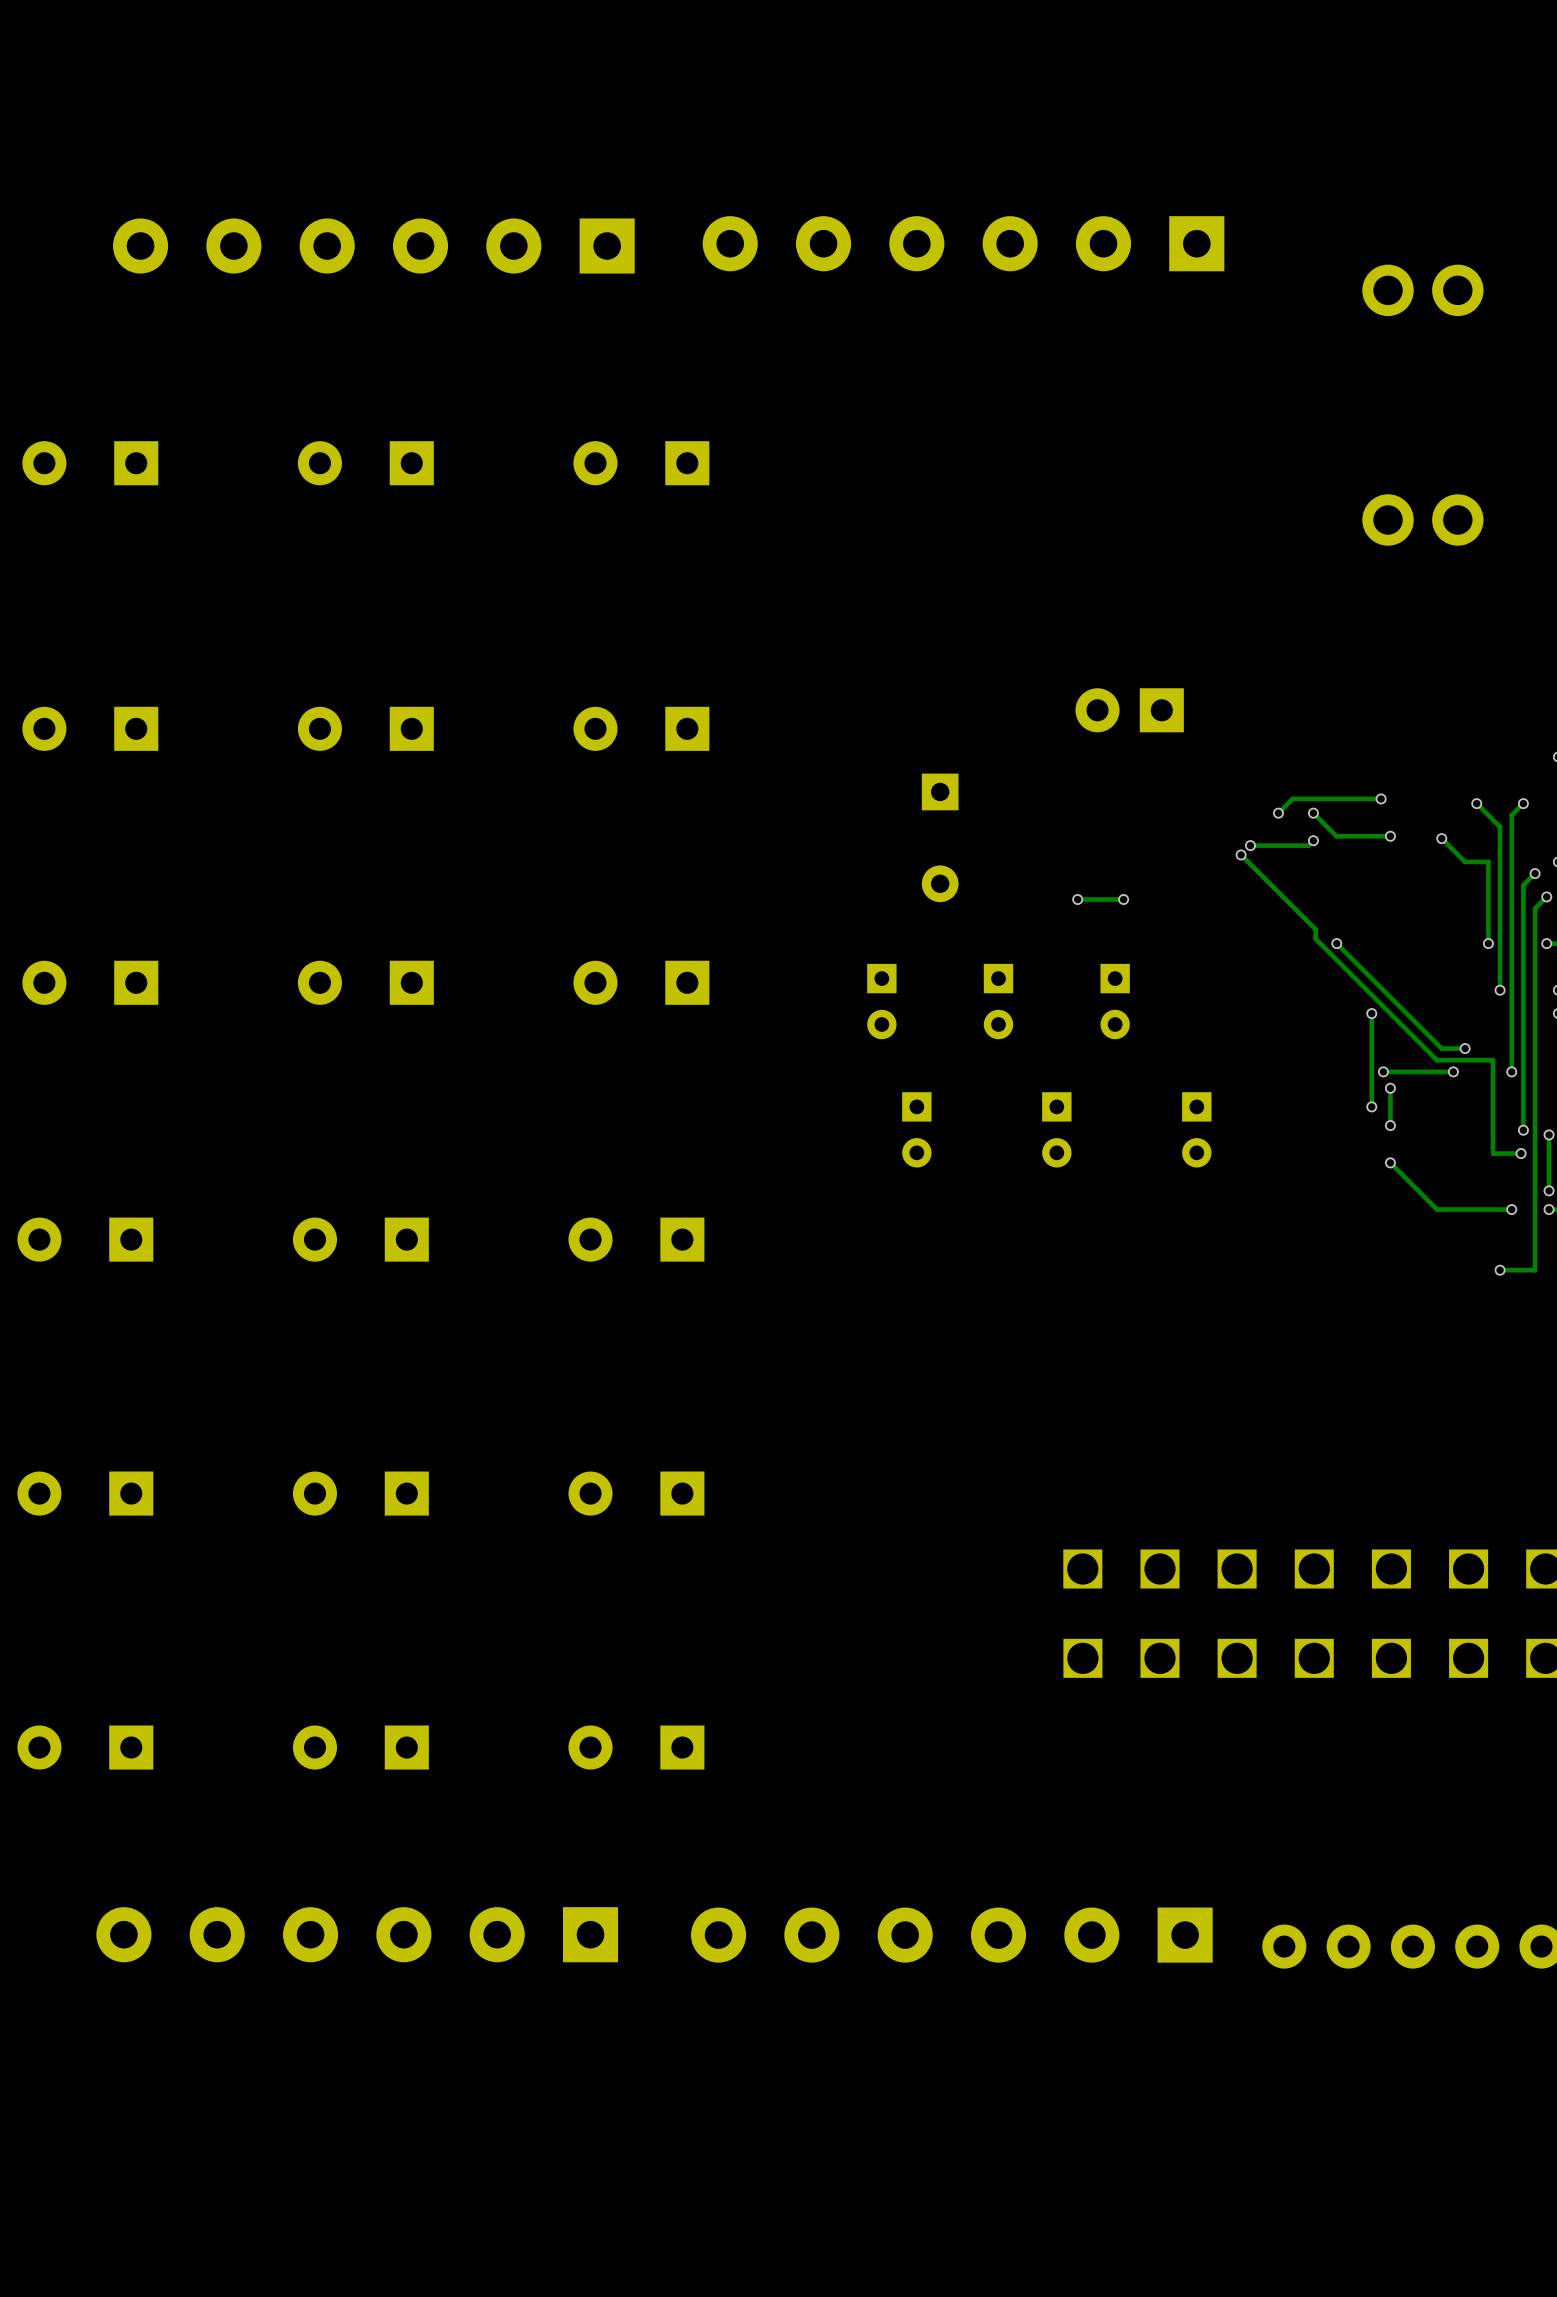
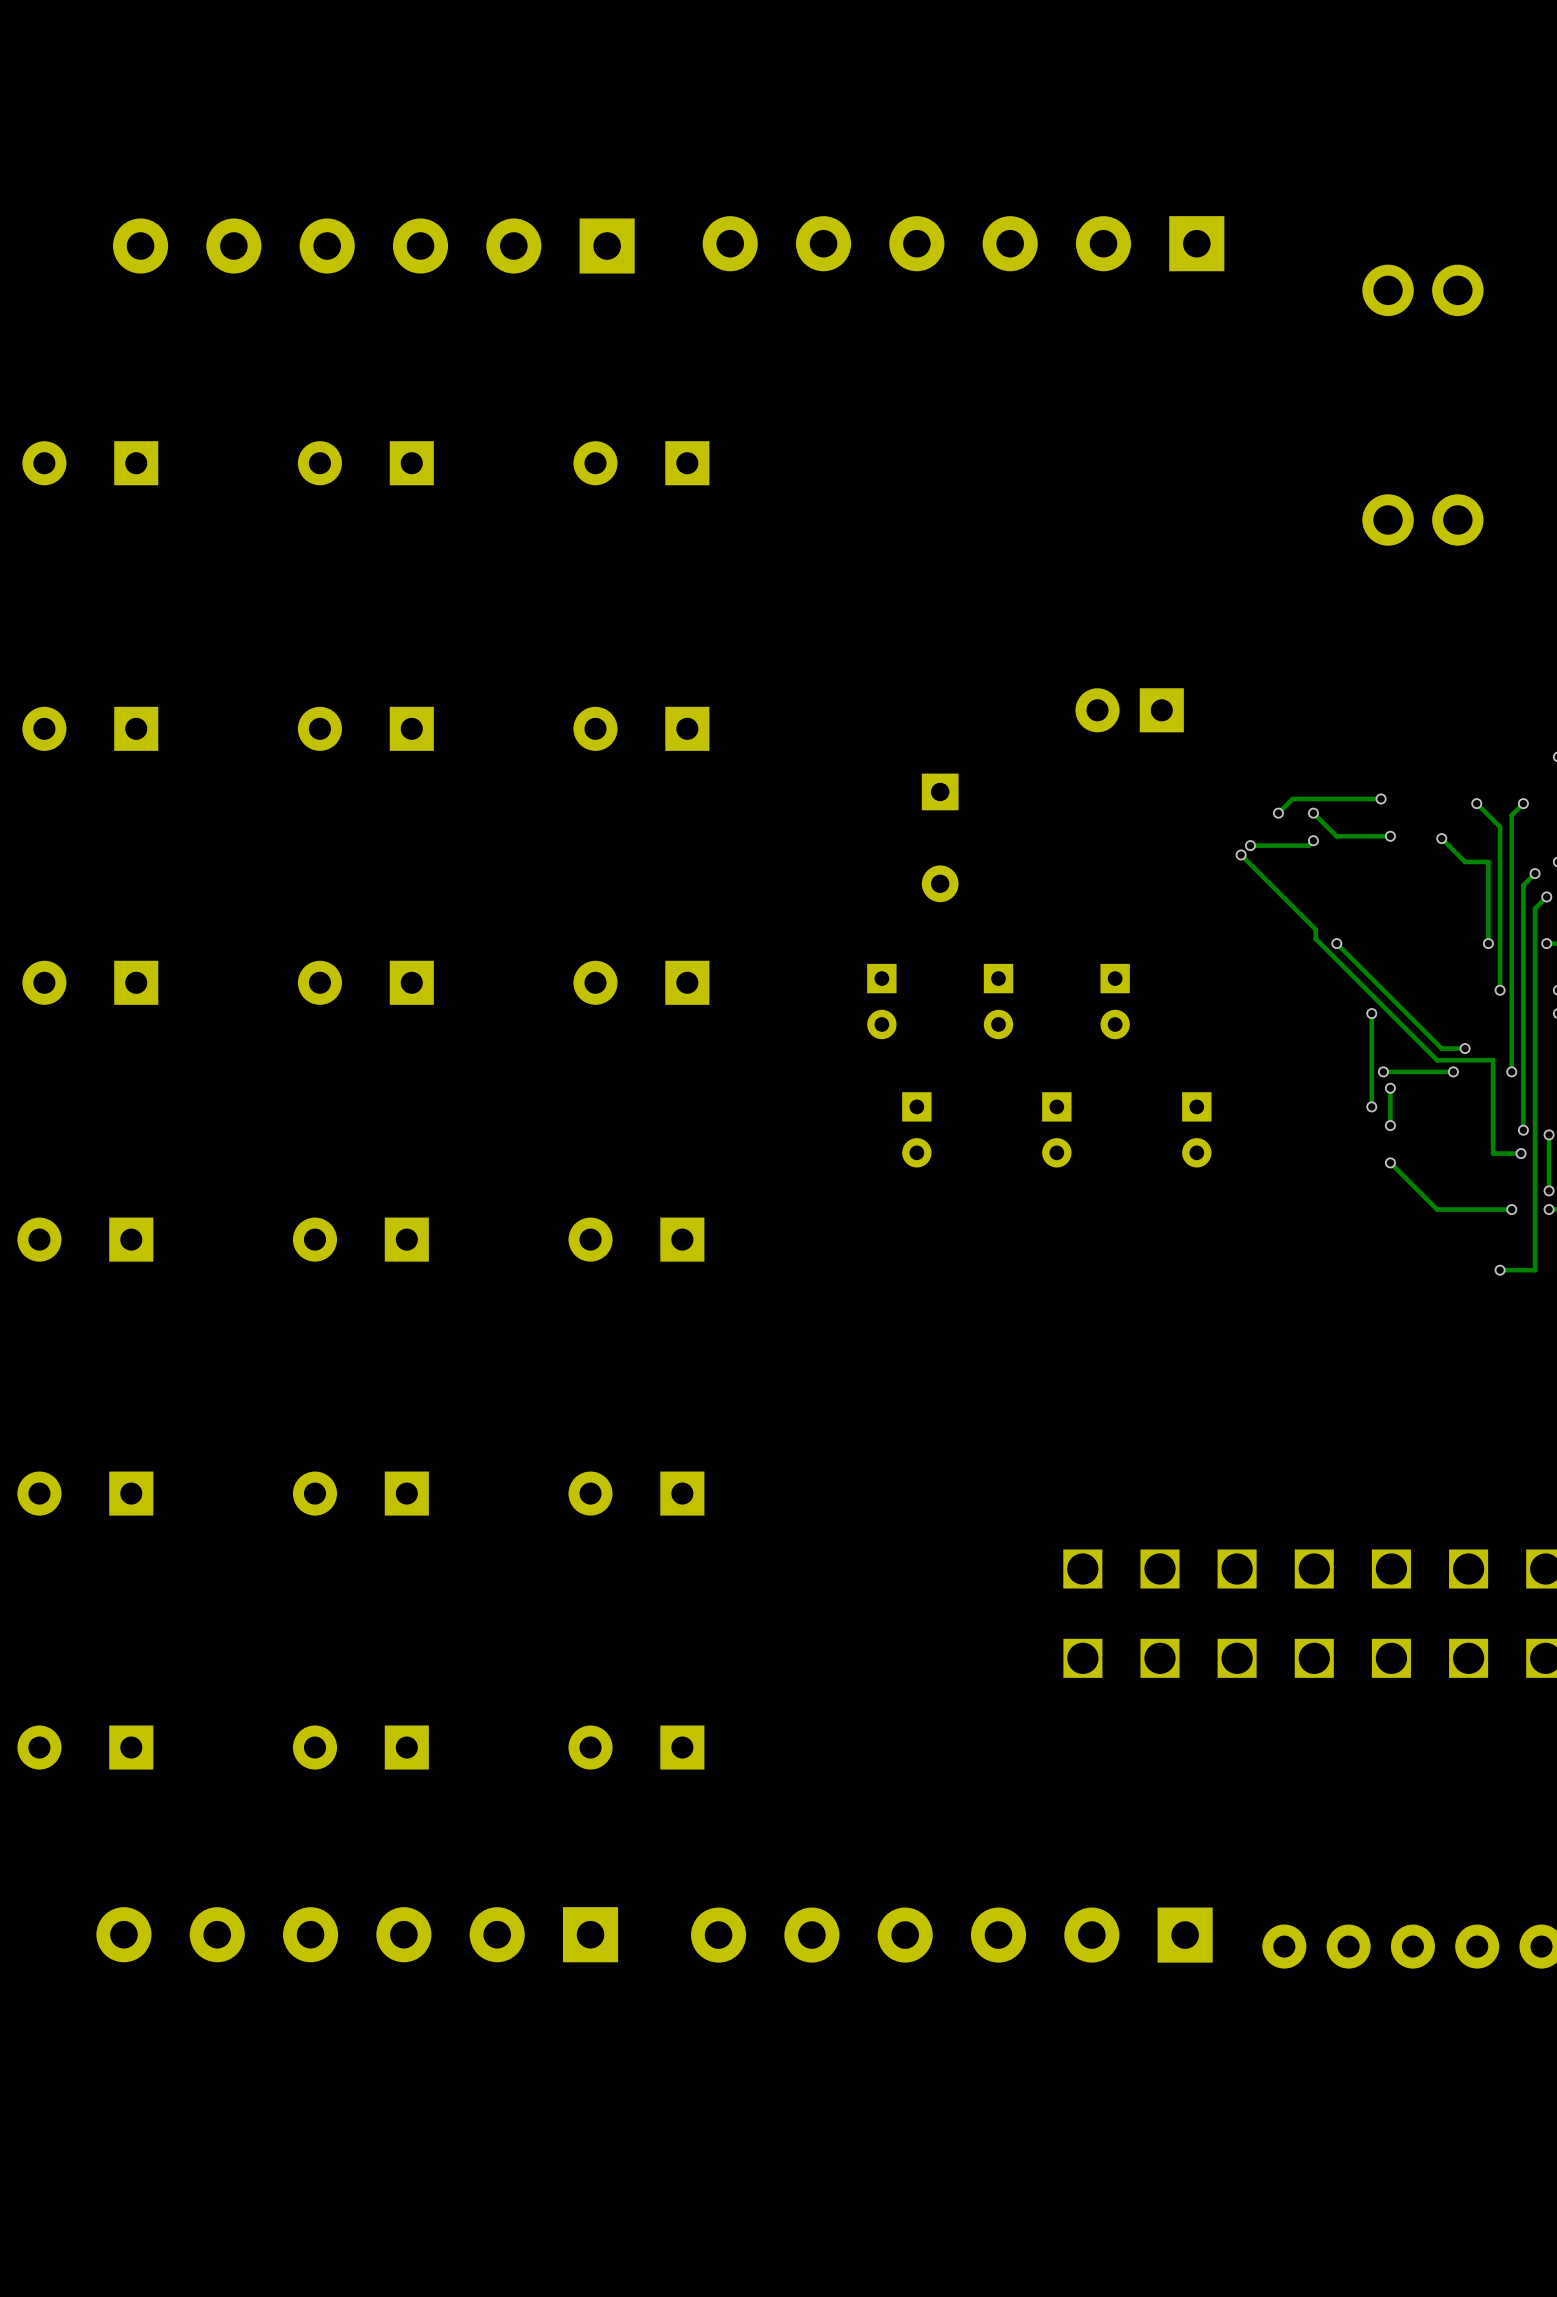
via: (1077, 899) -> none
track: (1123, 899) (1077, 899) -> none
via: (1123, 899) -> none

